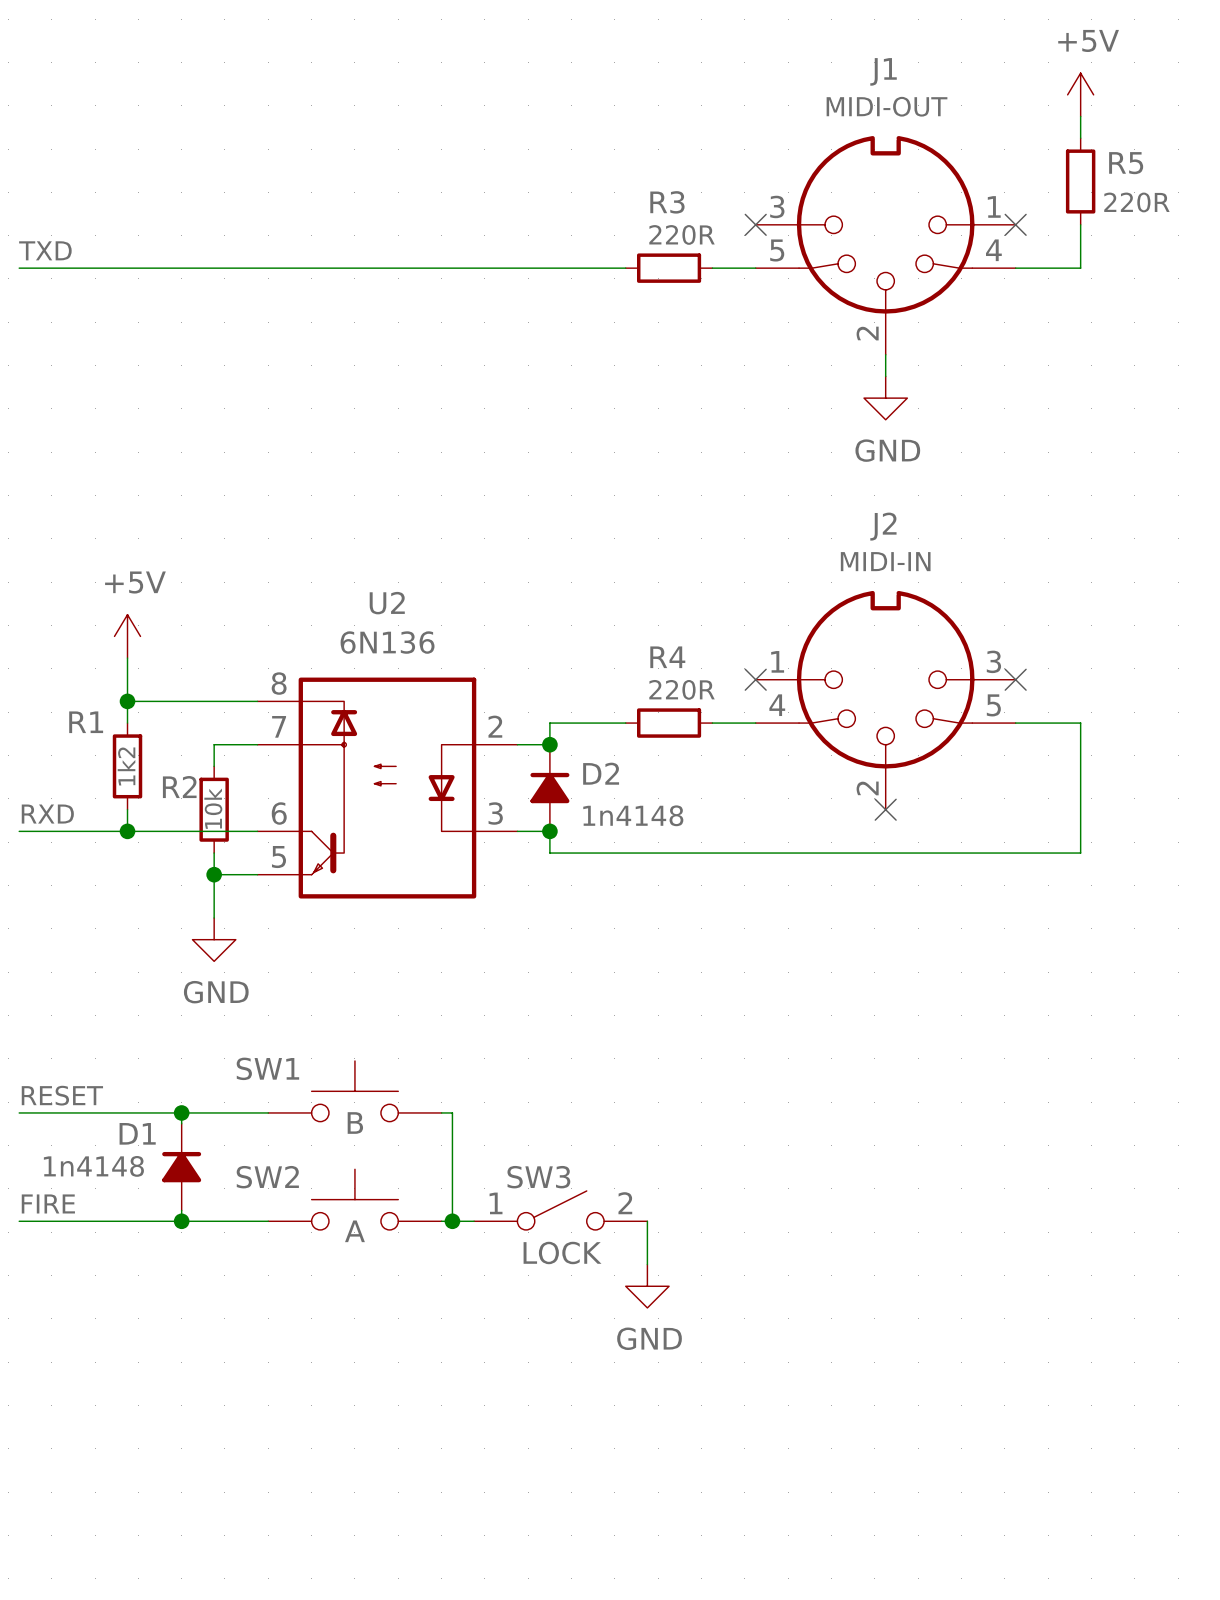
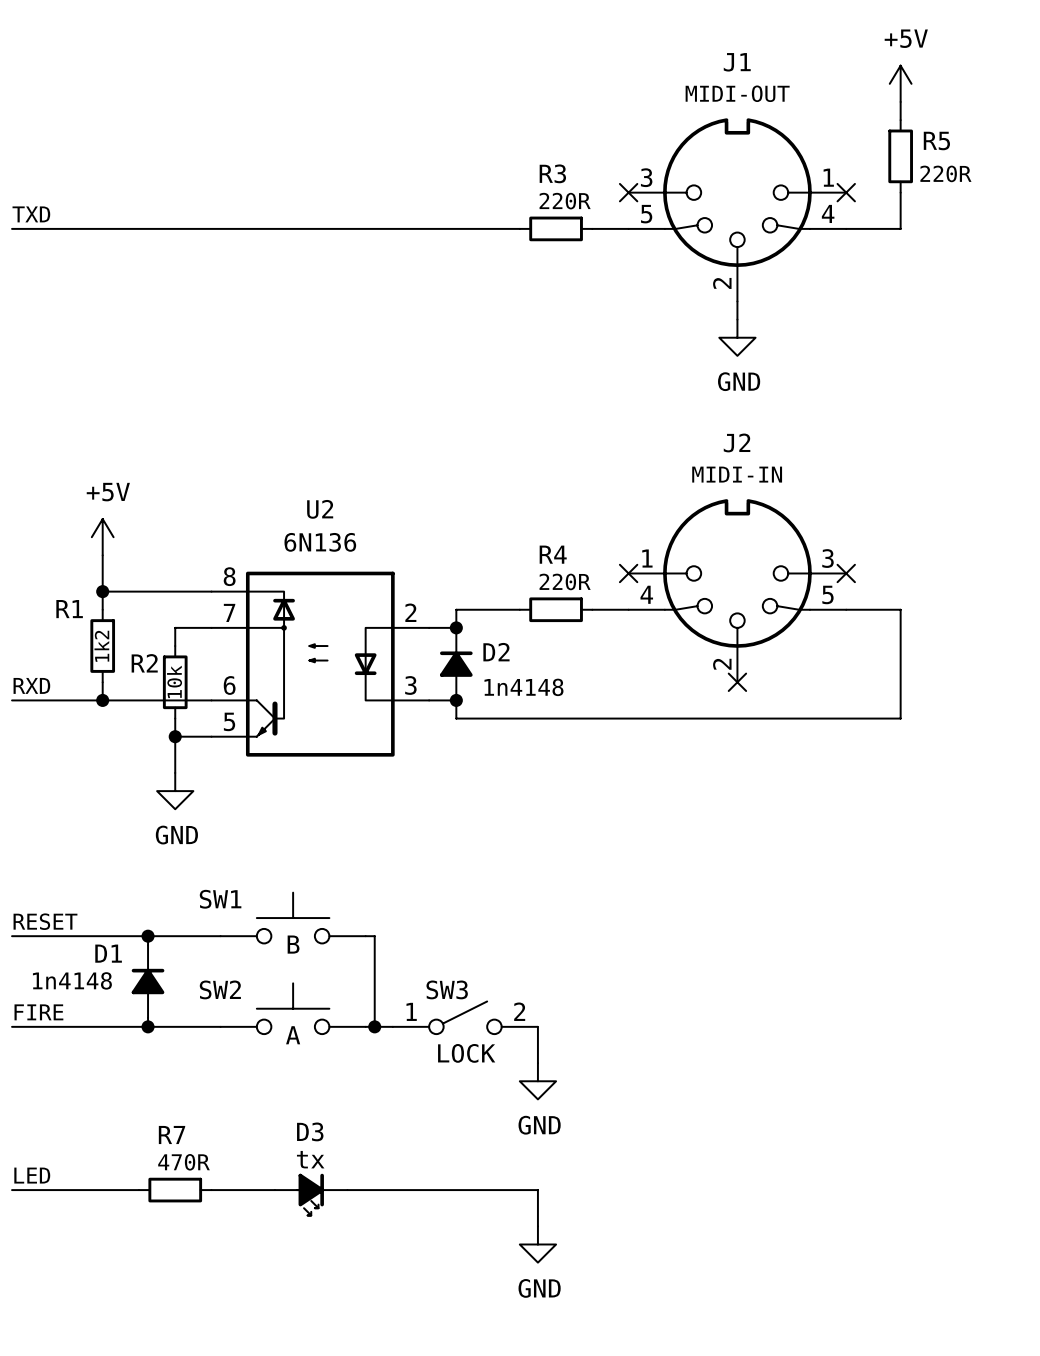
label: none -> LED (32, 1175)
wire: none -> (12, 1190) (138, 1190)
R7: none -> 470R (175, 1190)
wire: none -> (211, 1190) (274, 1190)
wire: none -> (347, 1190) (537, 1190) (537, 1226)
D3: none -> tx (311, 1194)
power symbol: none -> GND (537, 1244)

